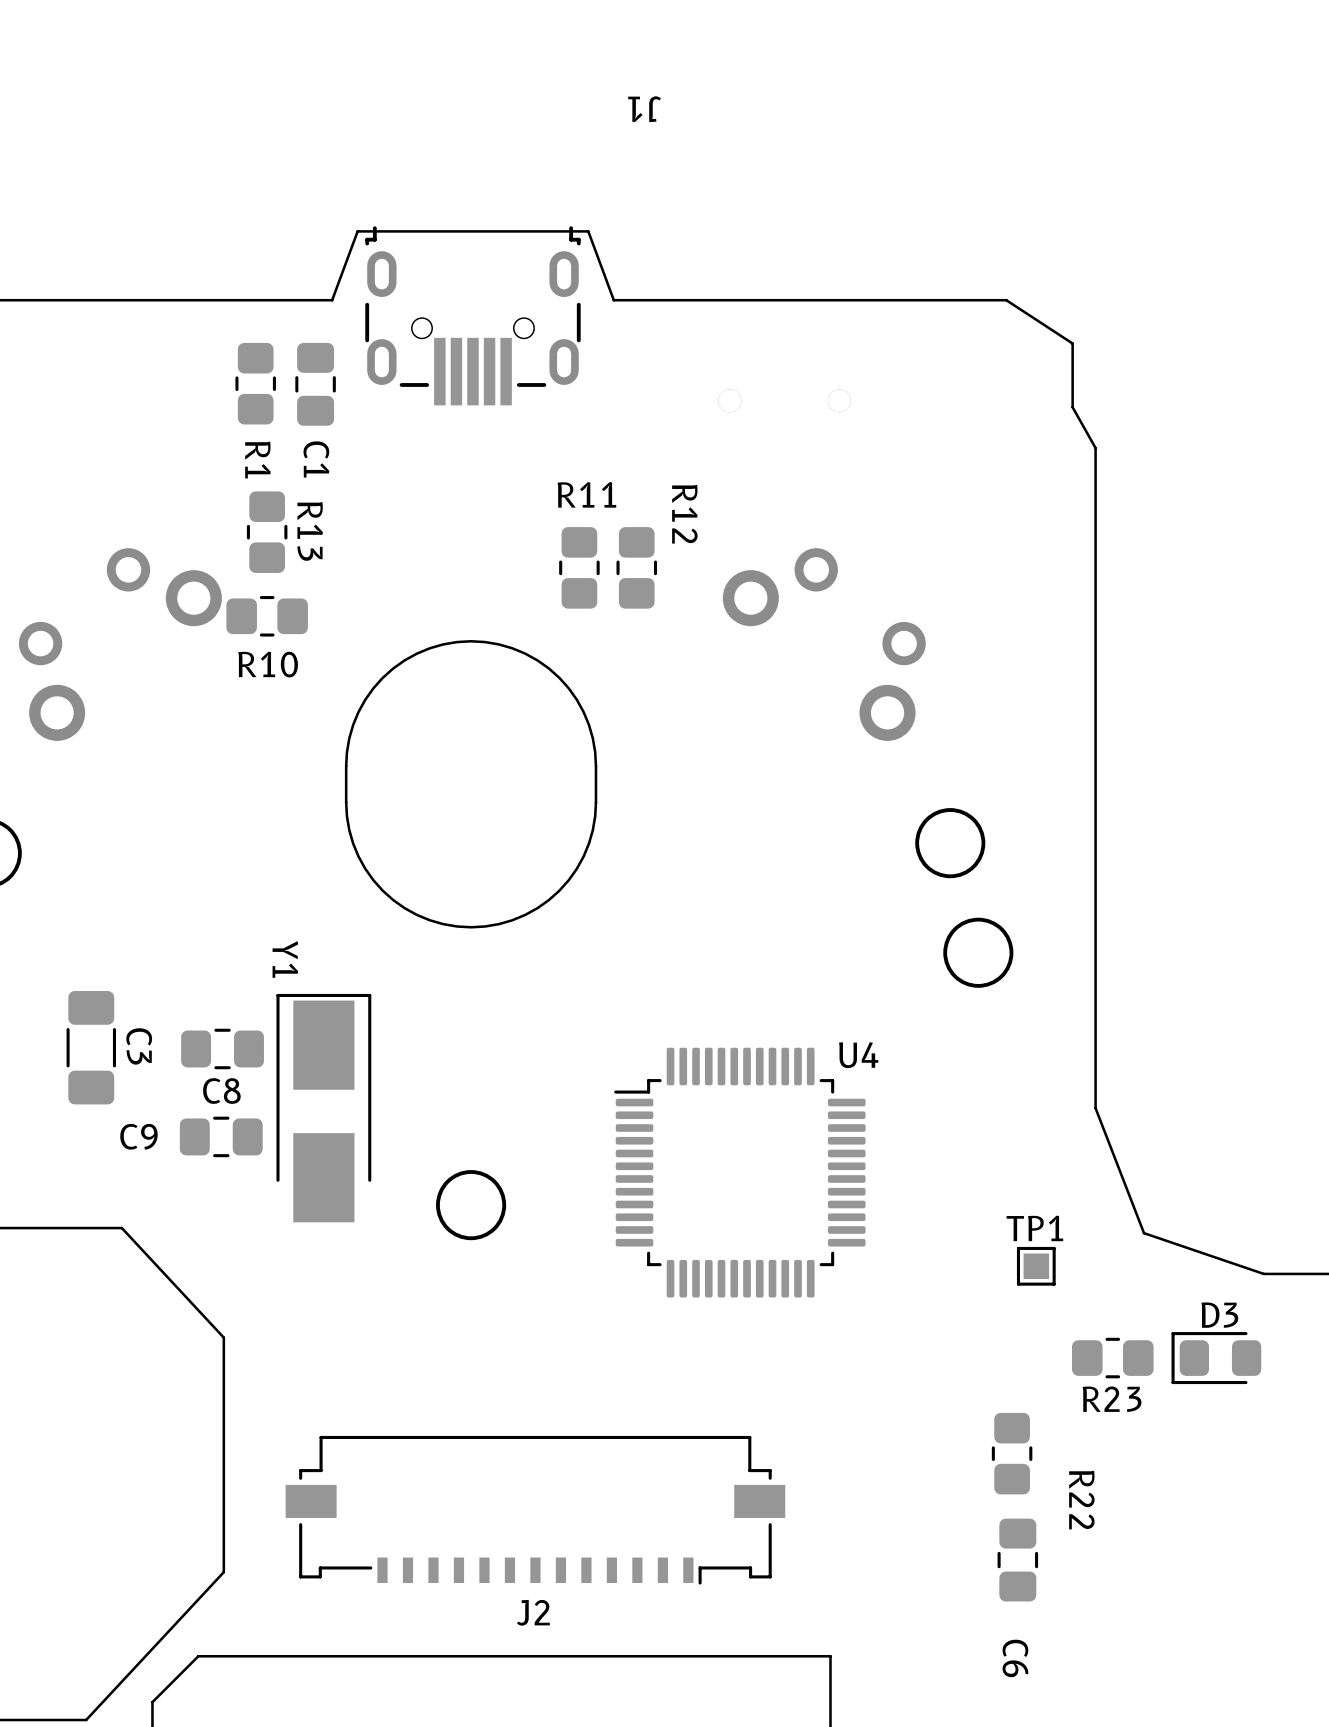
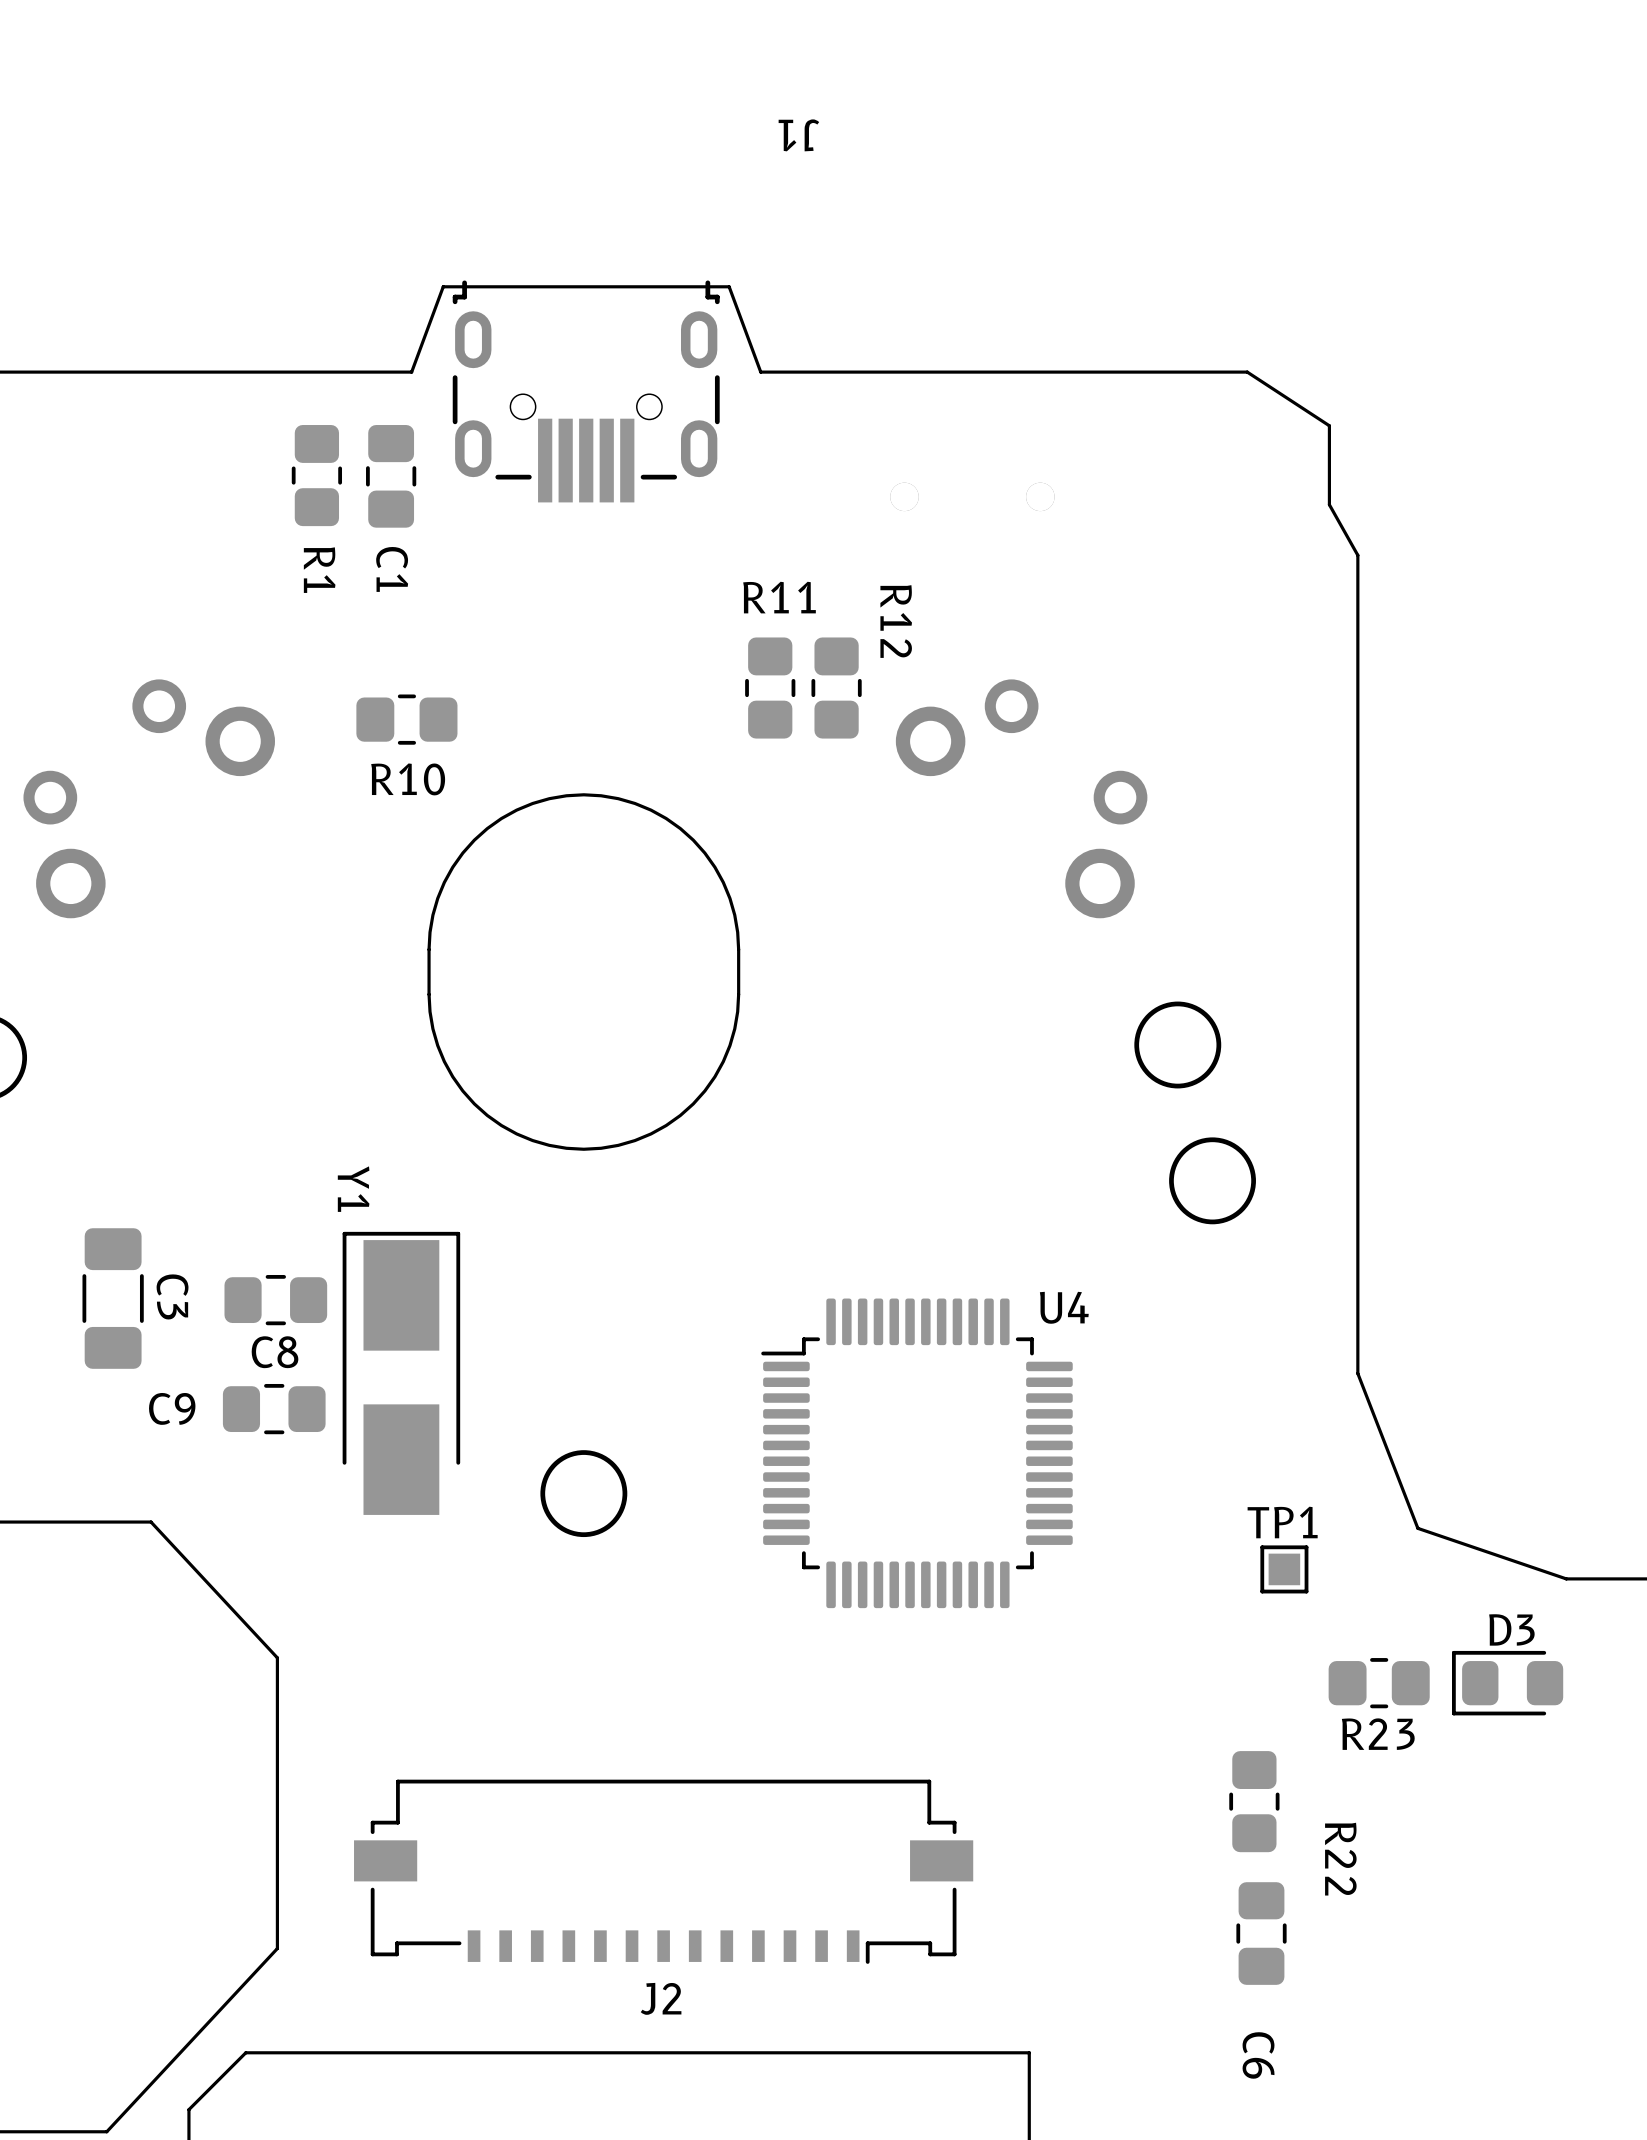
R13: (267, 532) -> none
R11 position: (579, 567) -> (770, 688)
R12 position: (636, 567) -> (836, 688)
R10 position: (267, 616) -> (406, 719)

